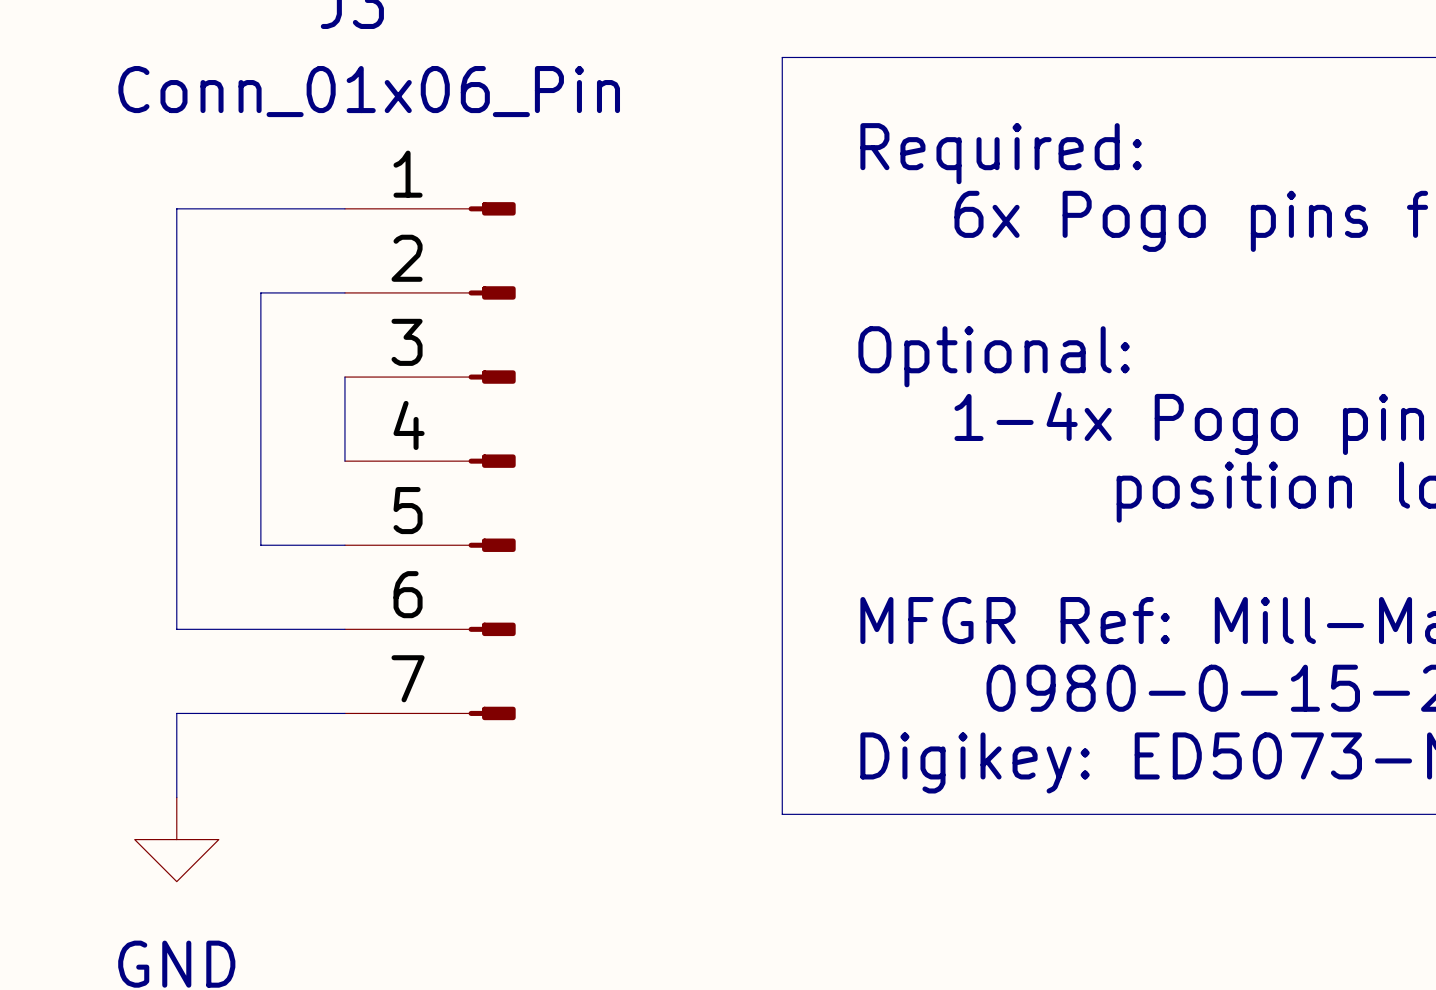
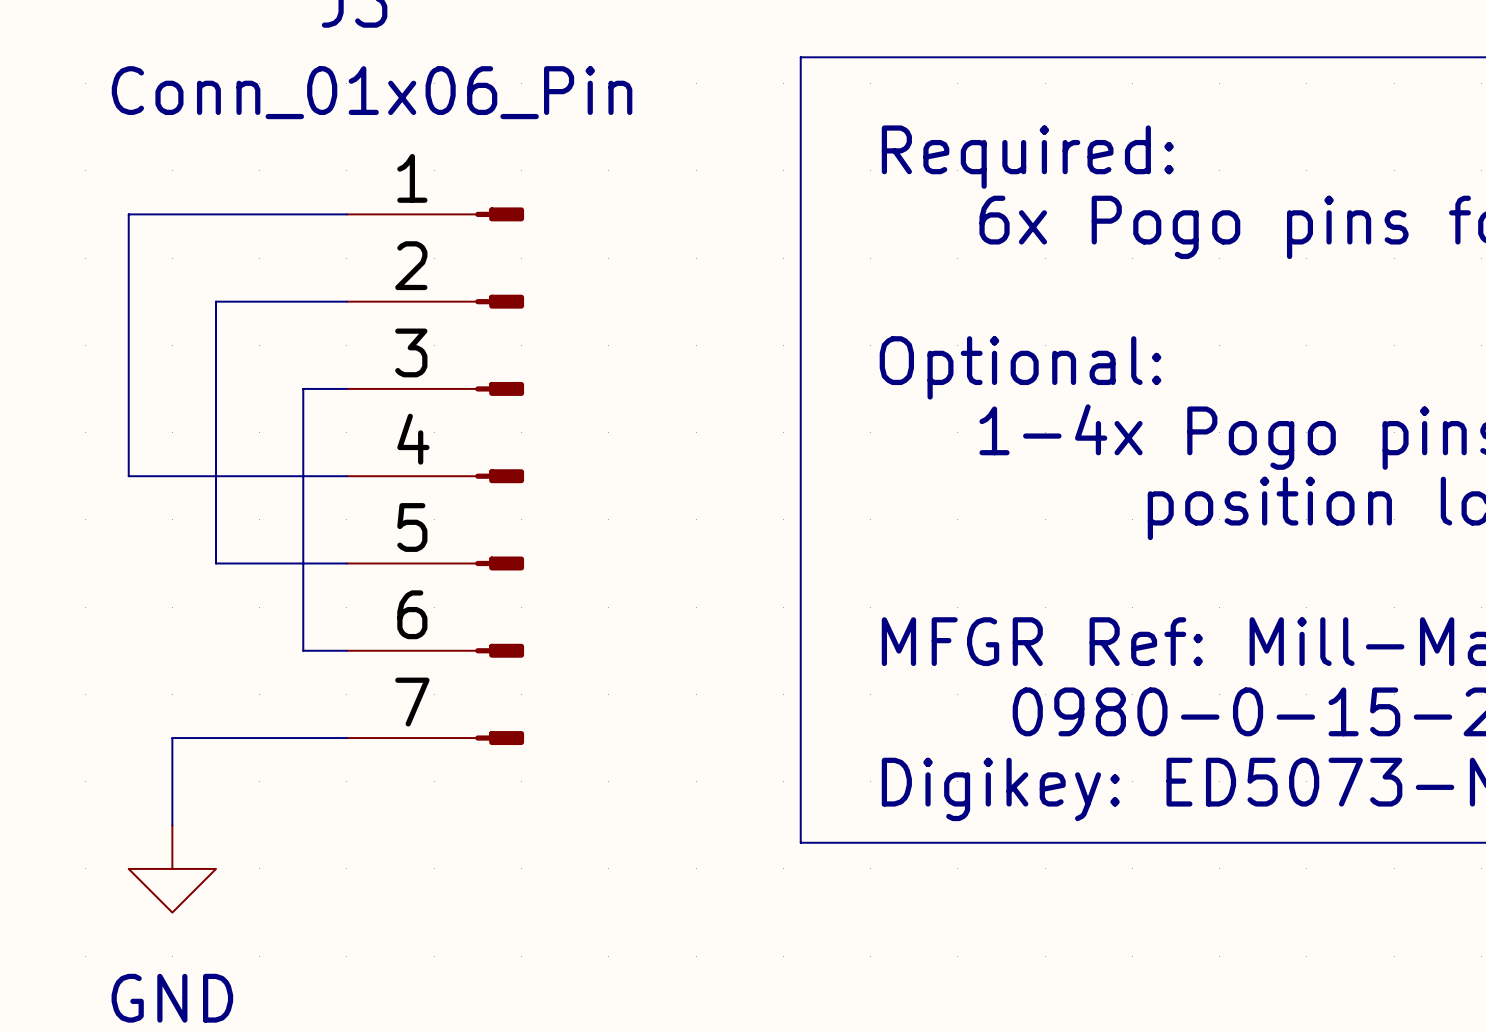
wire: (176, 208) (176, 629) (302, 629) -> (172, 214) (128, 214) (128, 476) (346, 476)
wire: (260, 292) (260, 545) -> (259, 301) (216, 301) (216, 563) (259, 563)
wire: (344, 377) (344, 461) -> (346, 388) (303, 388) (303, 650)

